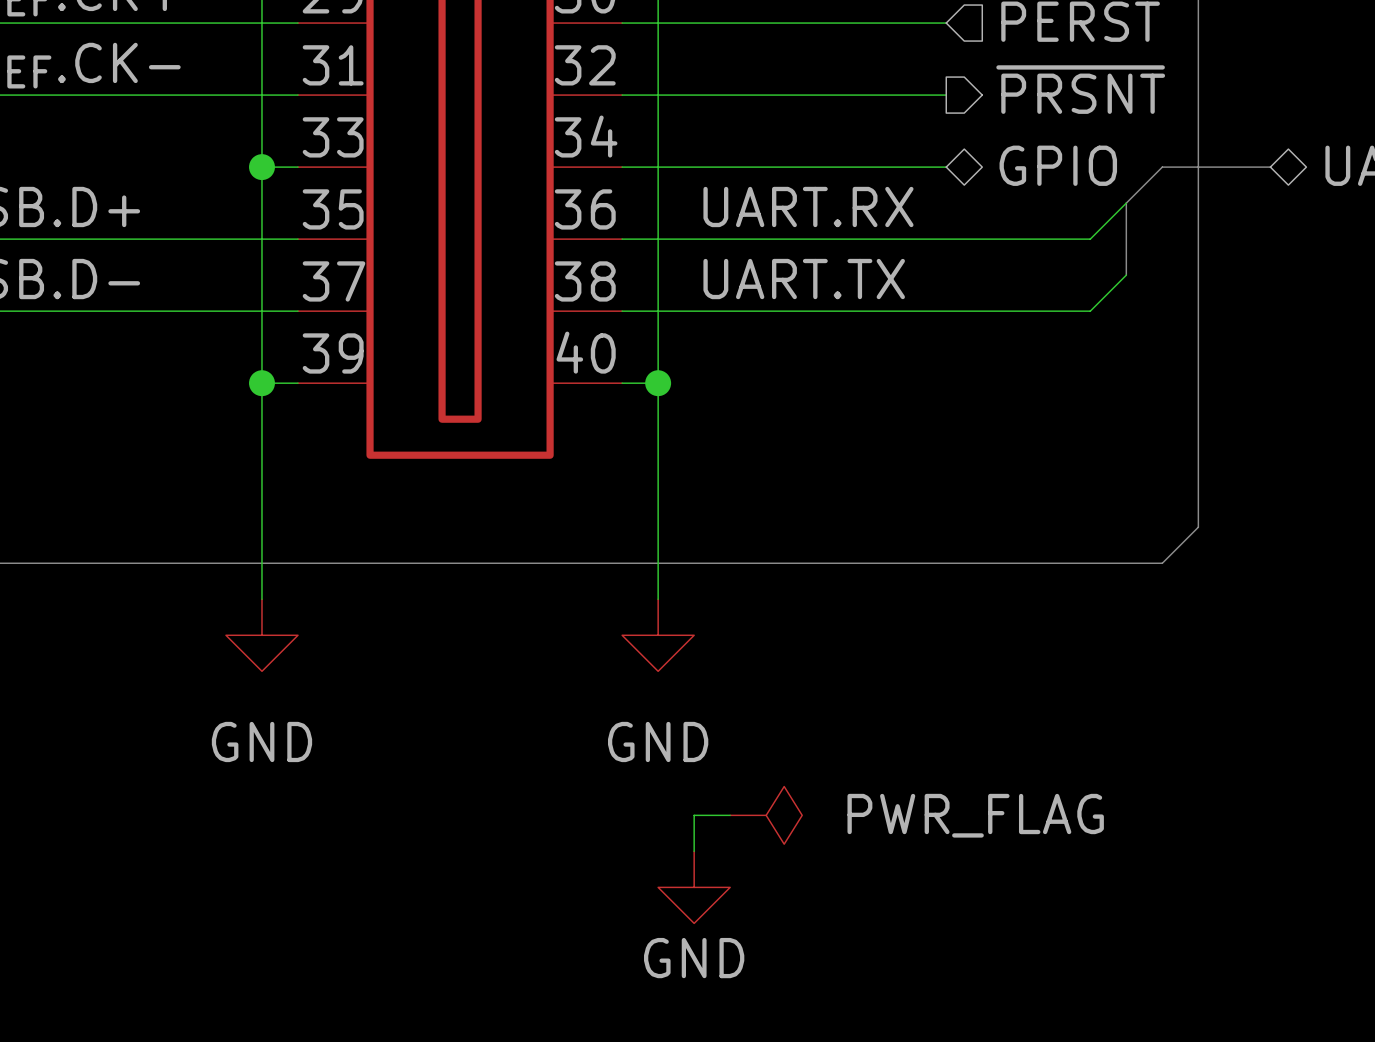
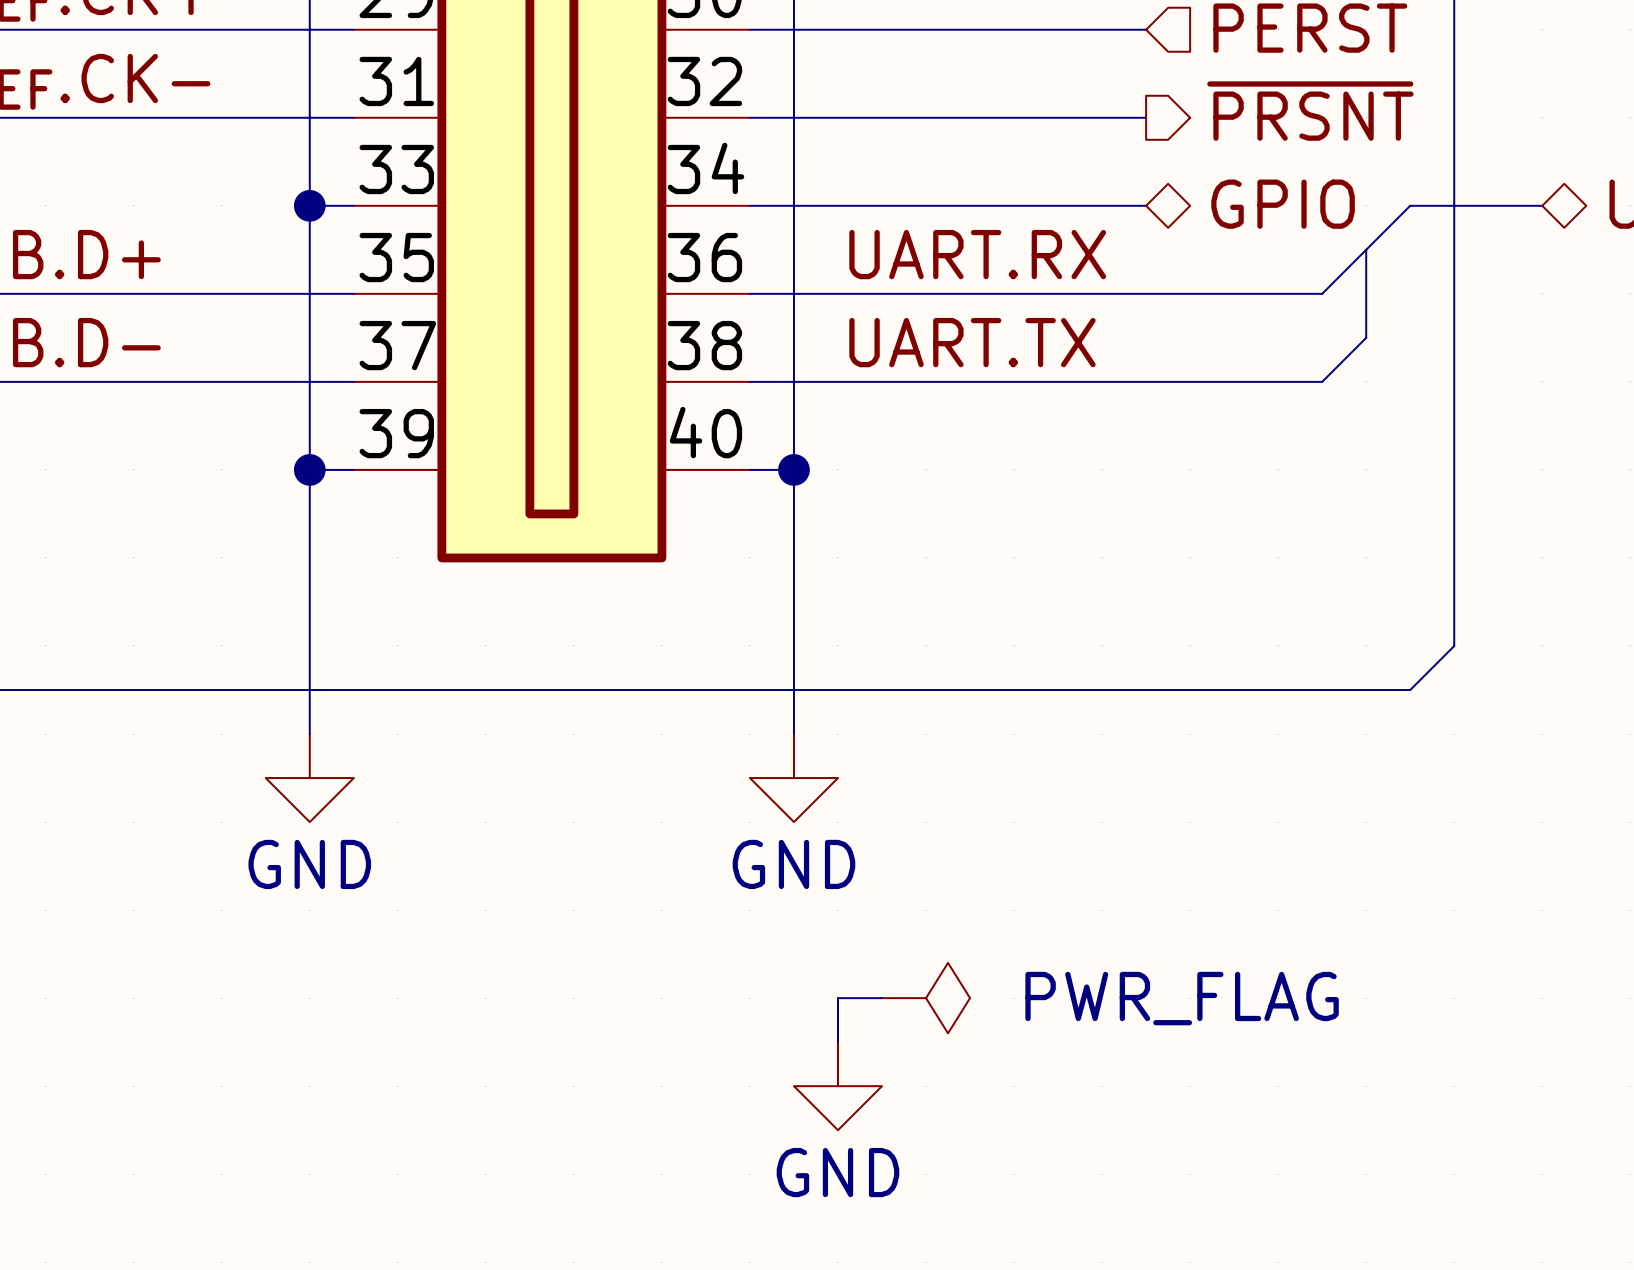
power symbol text position: GND (261, 741) -> GND (309, 864)
power symbol text position: GND (658, 741) -> GND (793, 864)

